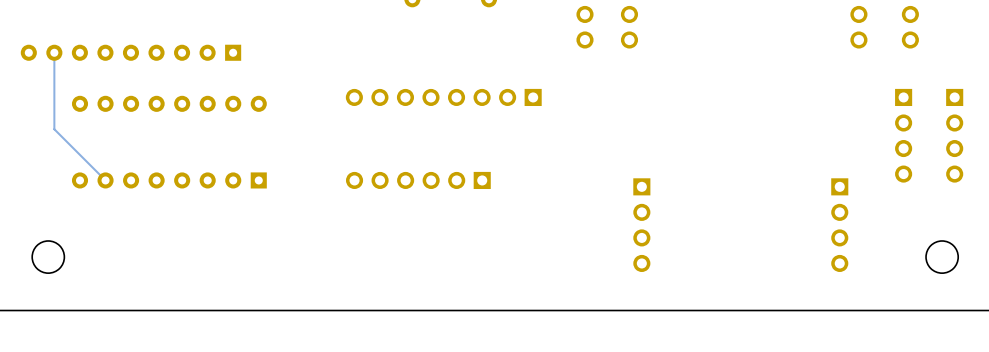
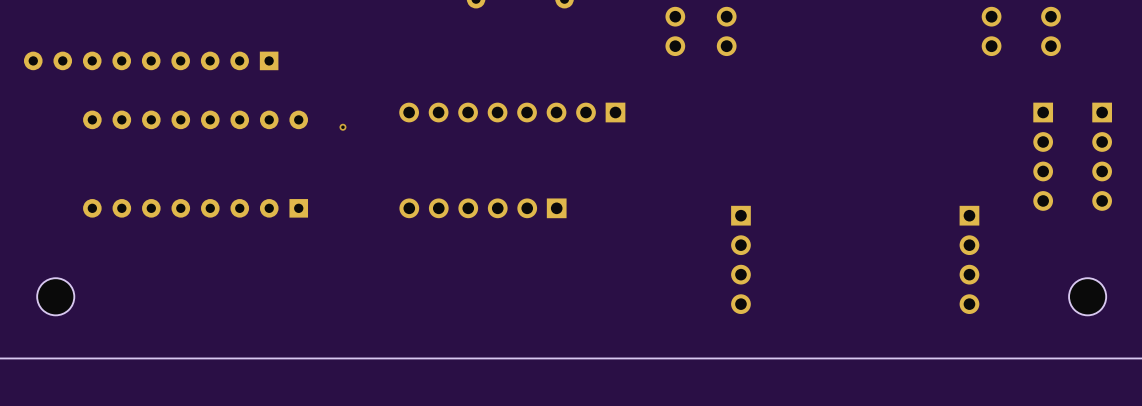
track: (54, 52) (54, 129) (105, 180) -> none
via: none -> (342, 127)

